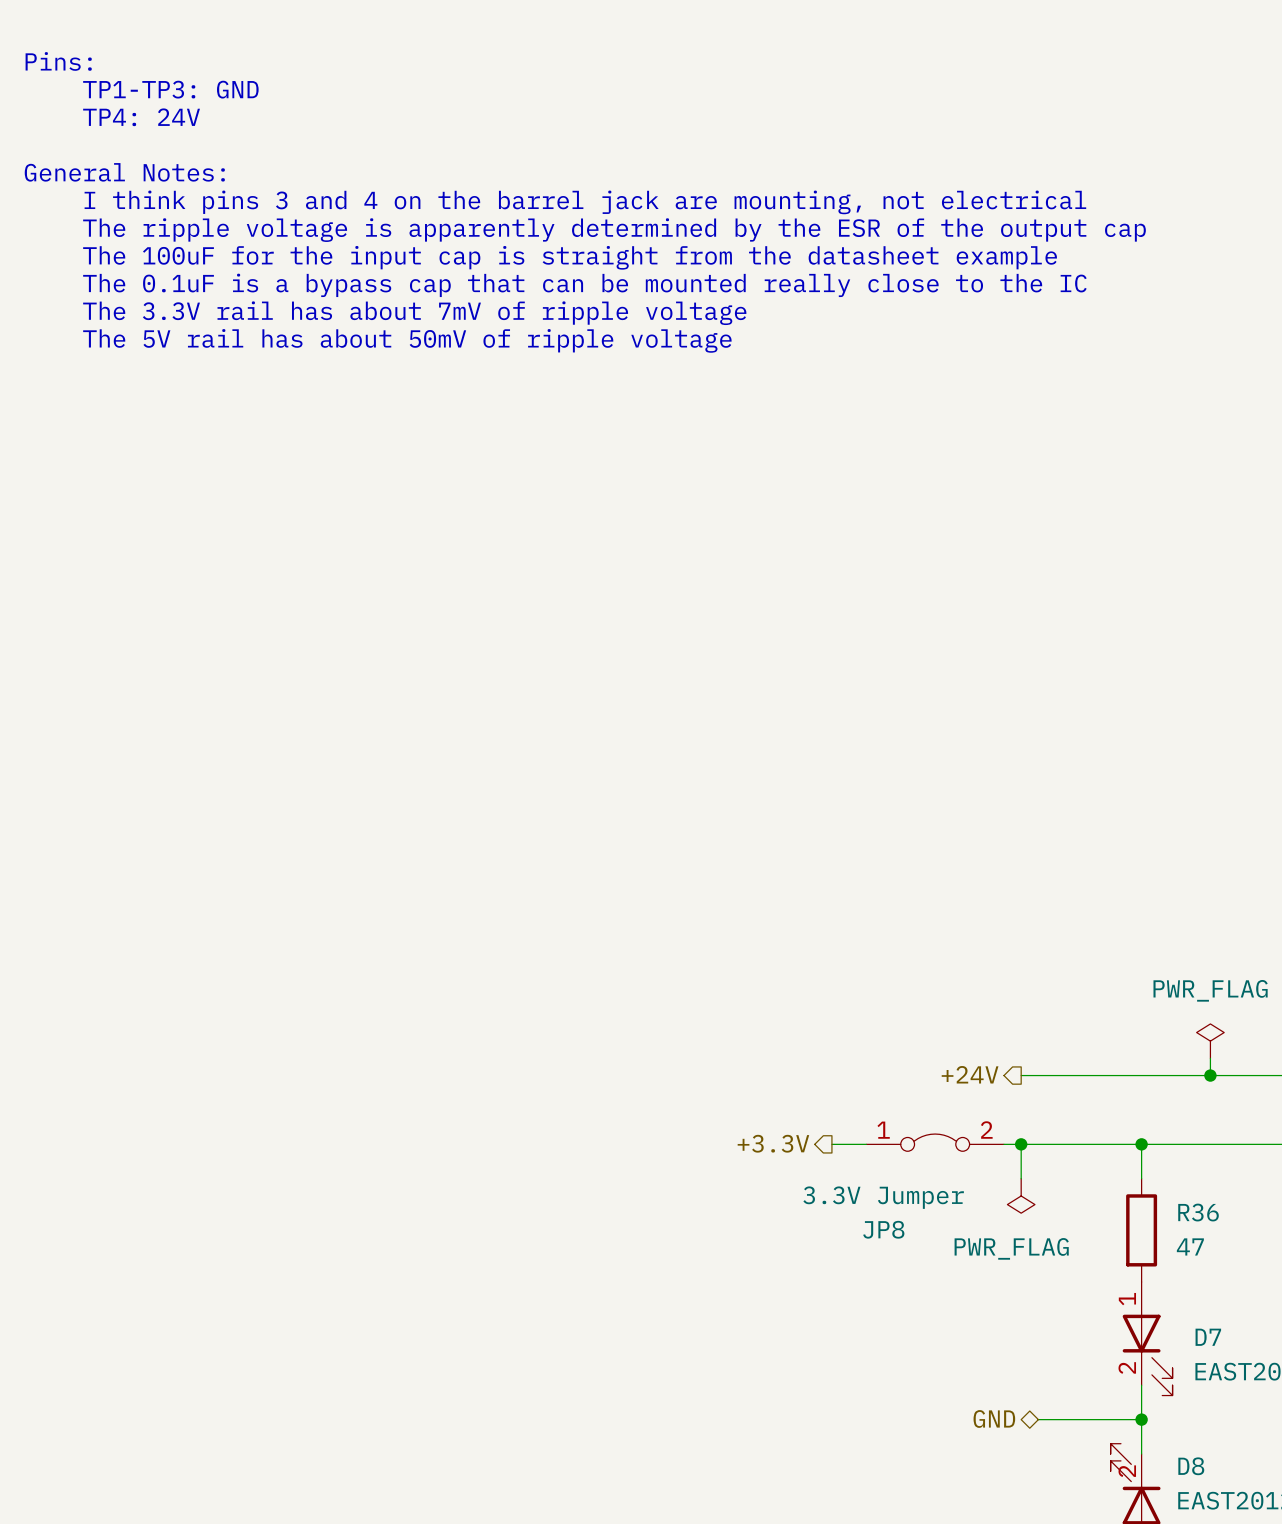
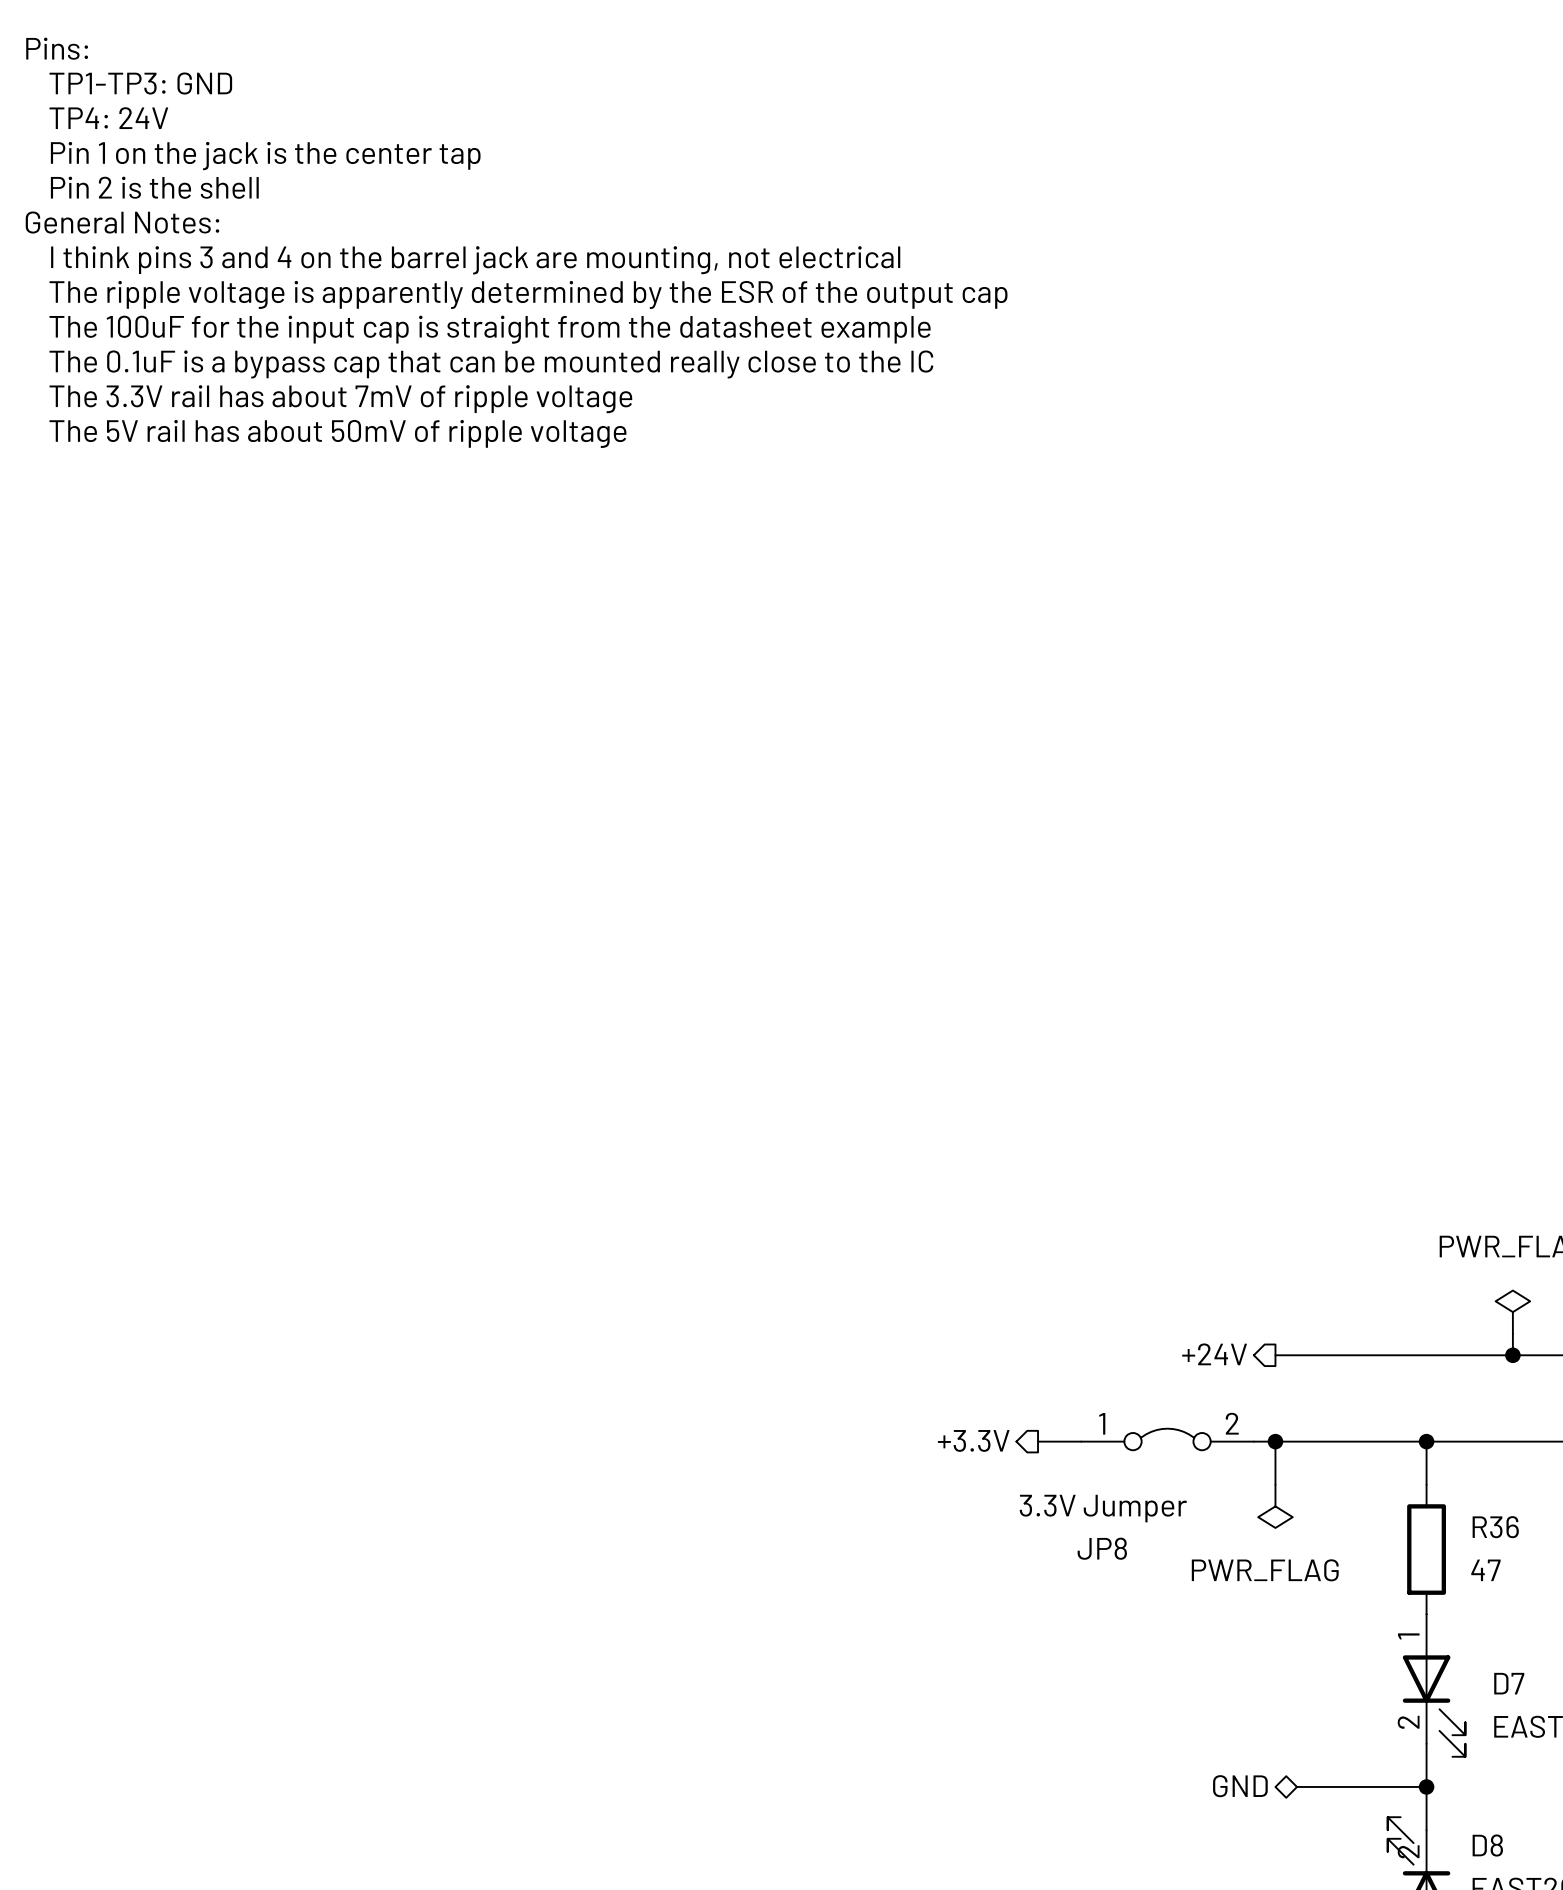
text: none -> Pins: (57, 48)
text: Pins: (58, 61) -> TP1-TP3: GND (140, 83)
text: TP1-TP3: GND (170, 89) -> TP4: 24V (108, 118)
text: TP4: 24V (141, 117) -> Pin 1 on the jack is the center tap (265, 156)
text: none -> Pin 2 is the shell (154, 187)

